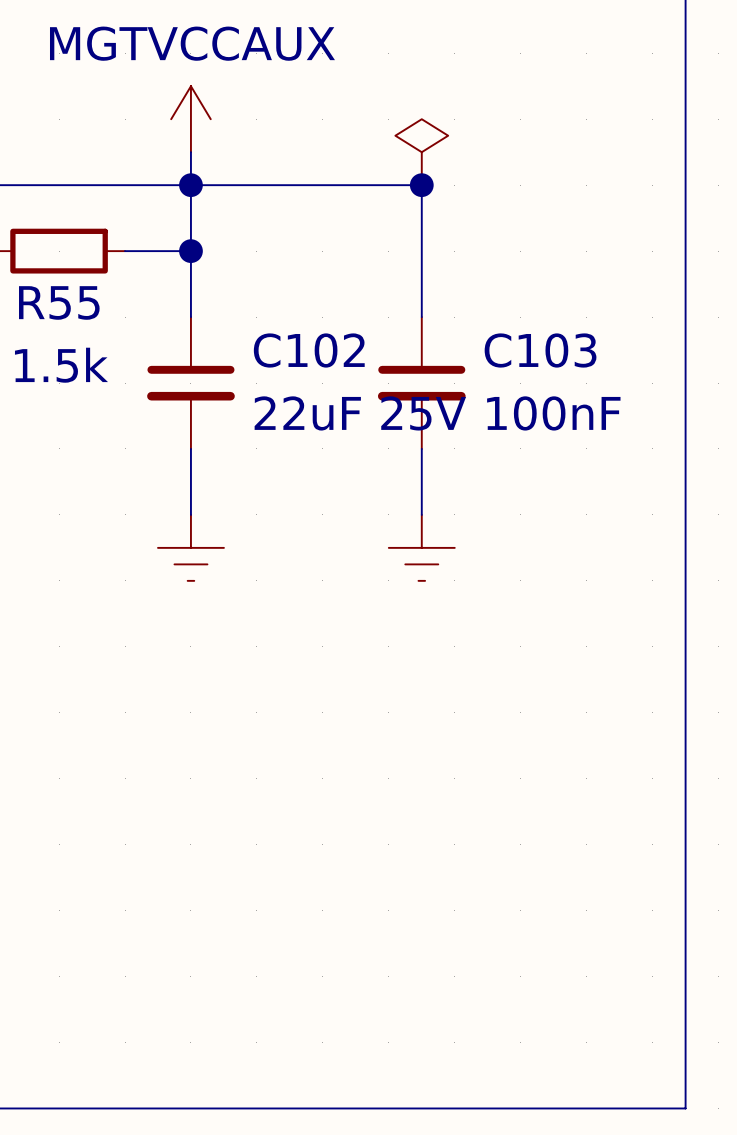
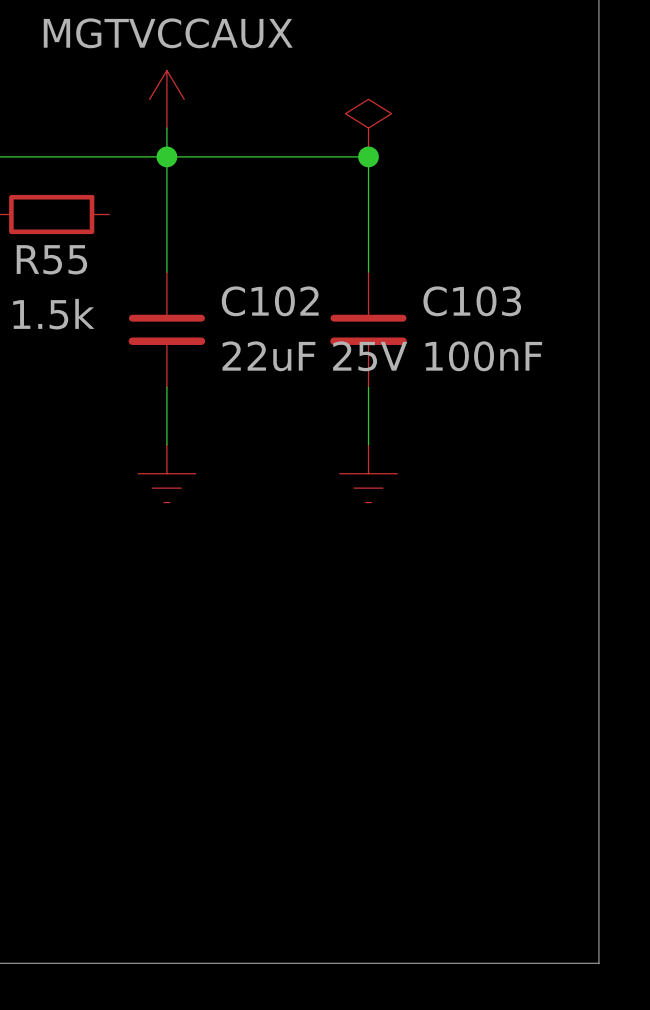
wire: (125, 251) (190, 251) -> none
junction: (190, 251) -> none

